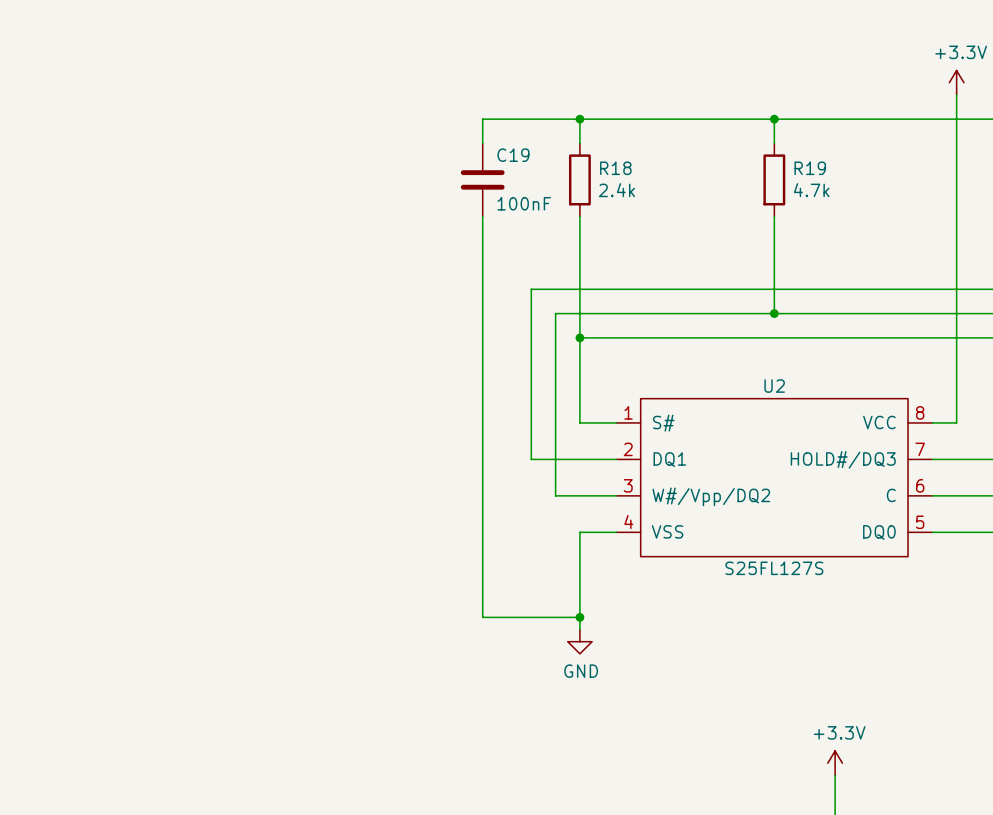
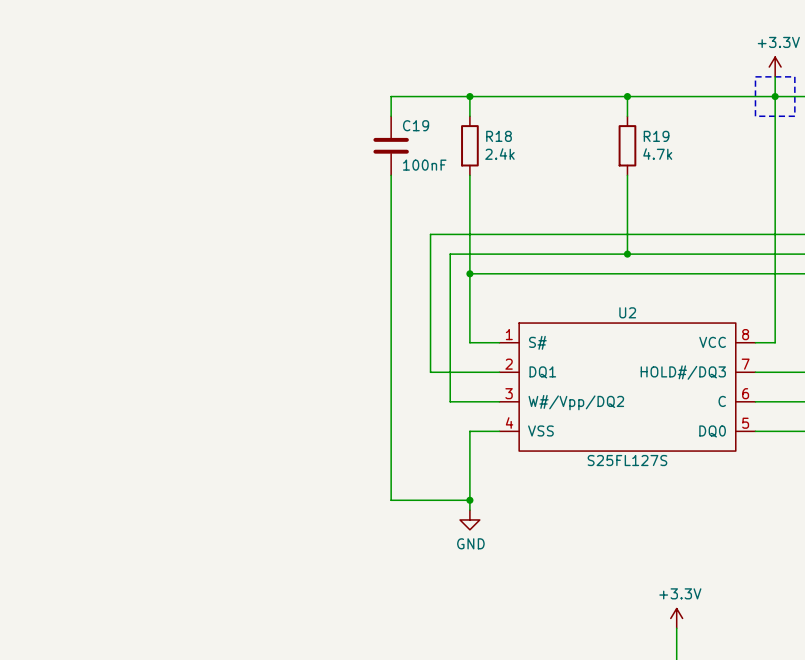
line: none -> (755, 76) (794, 76) (794, 116) (755, 116) (755, 76)
junction: none -> (775, 96)

